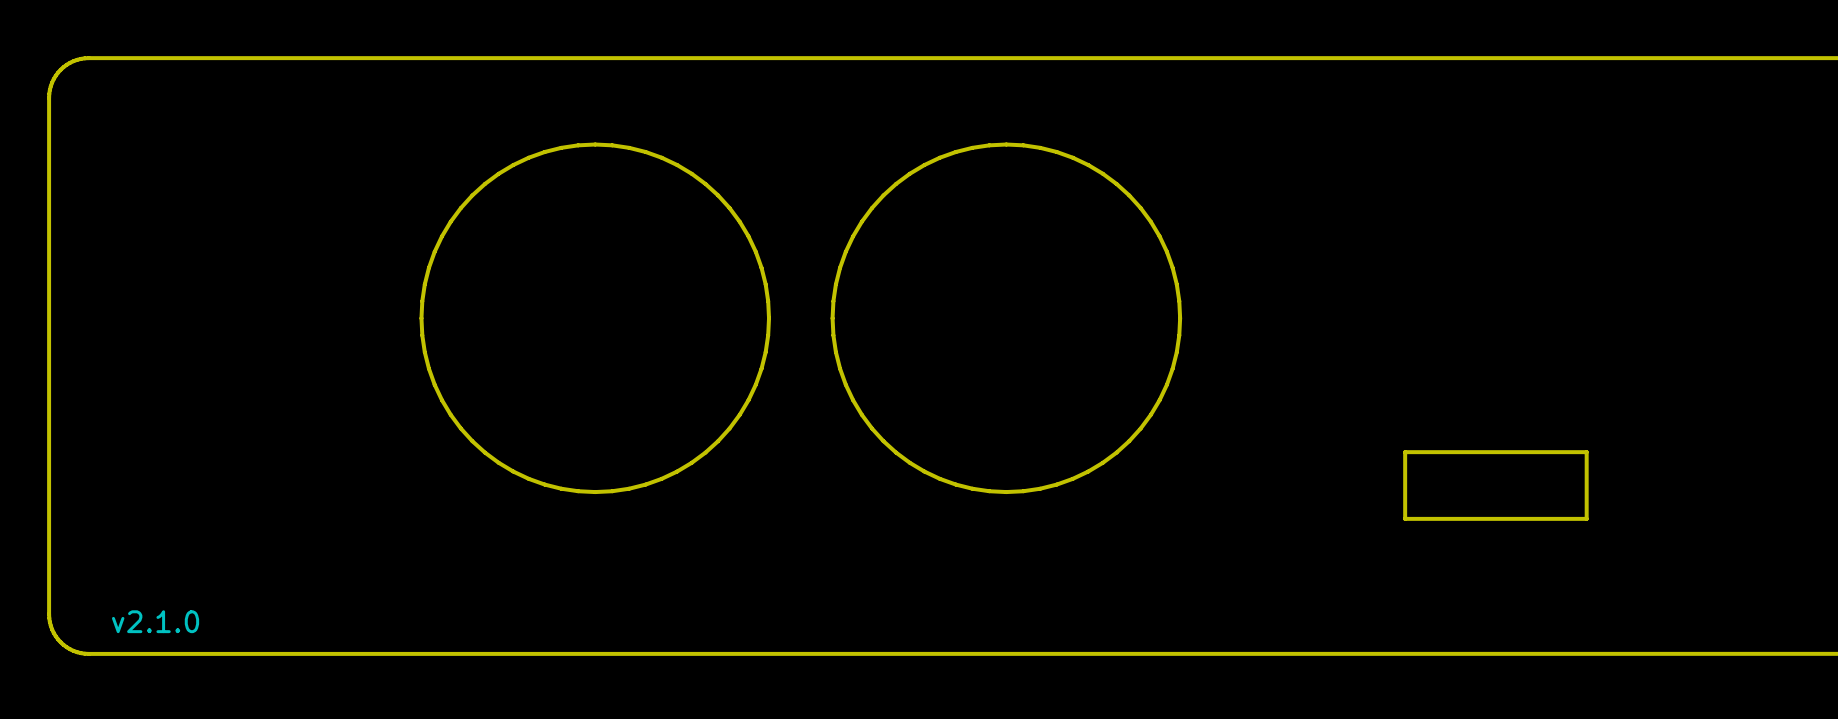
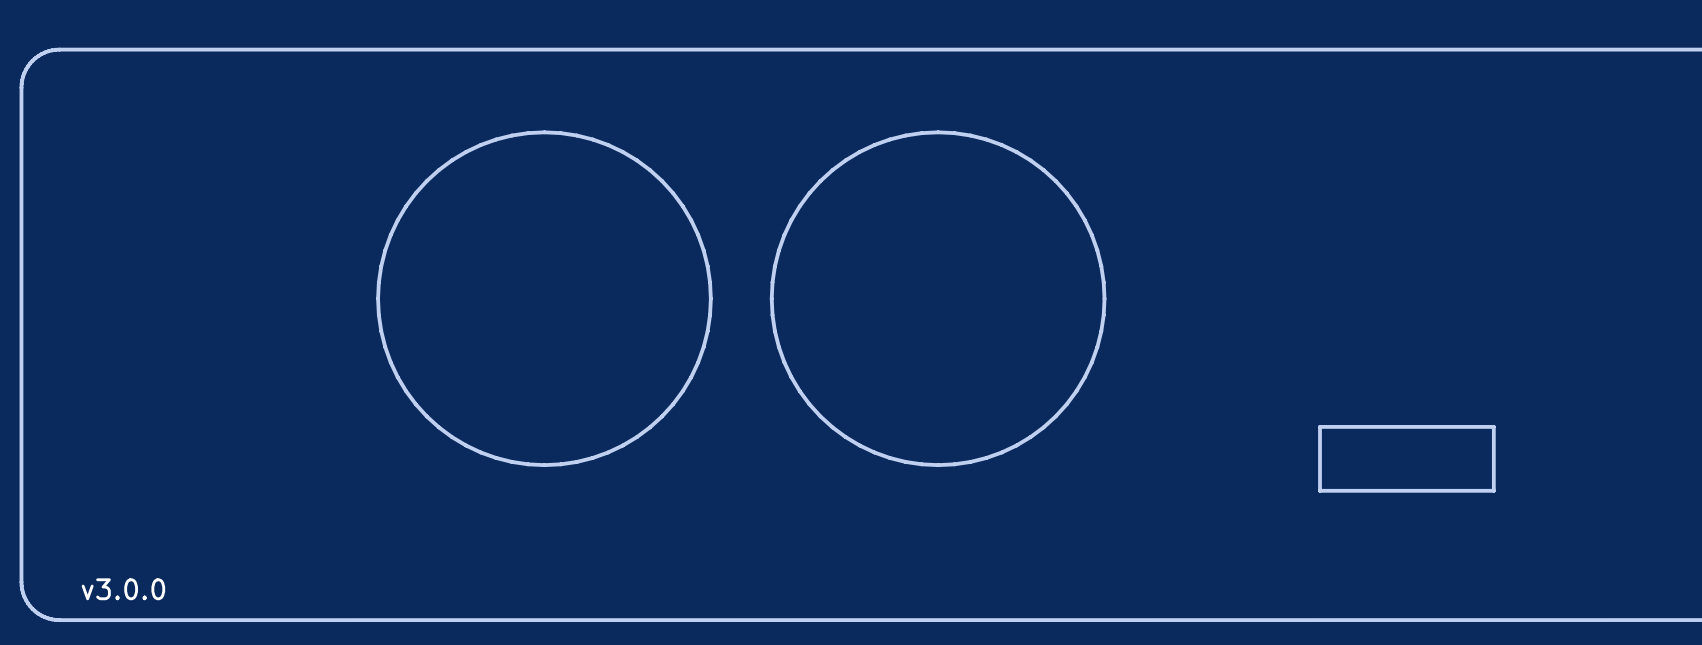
text: v2.1.0 (155, 621) -> v3.0.0 (123, 589)

